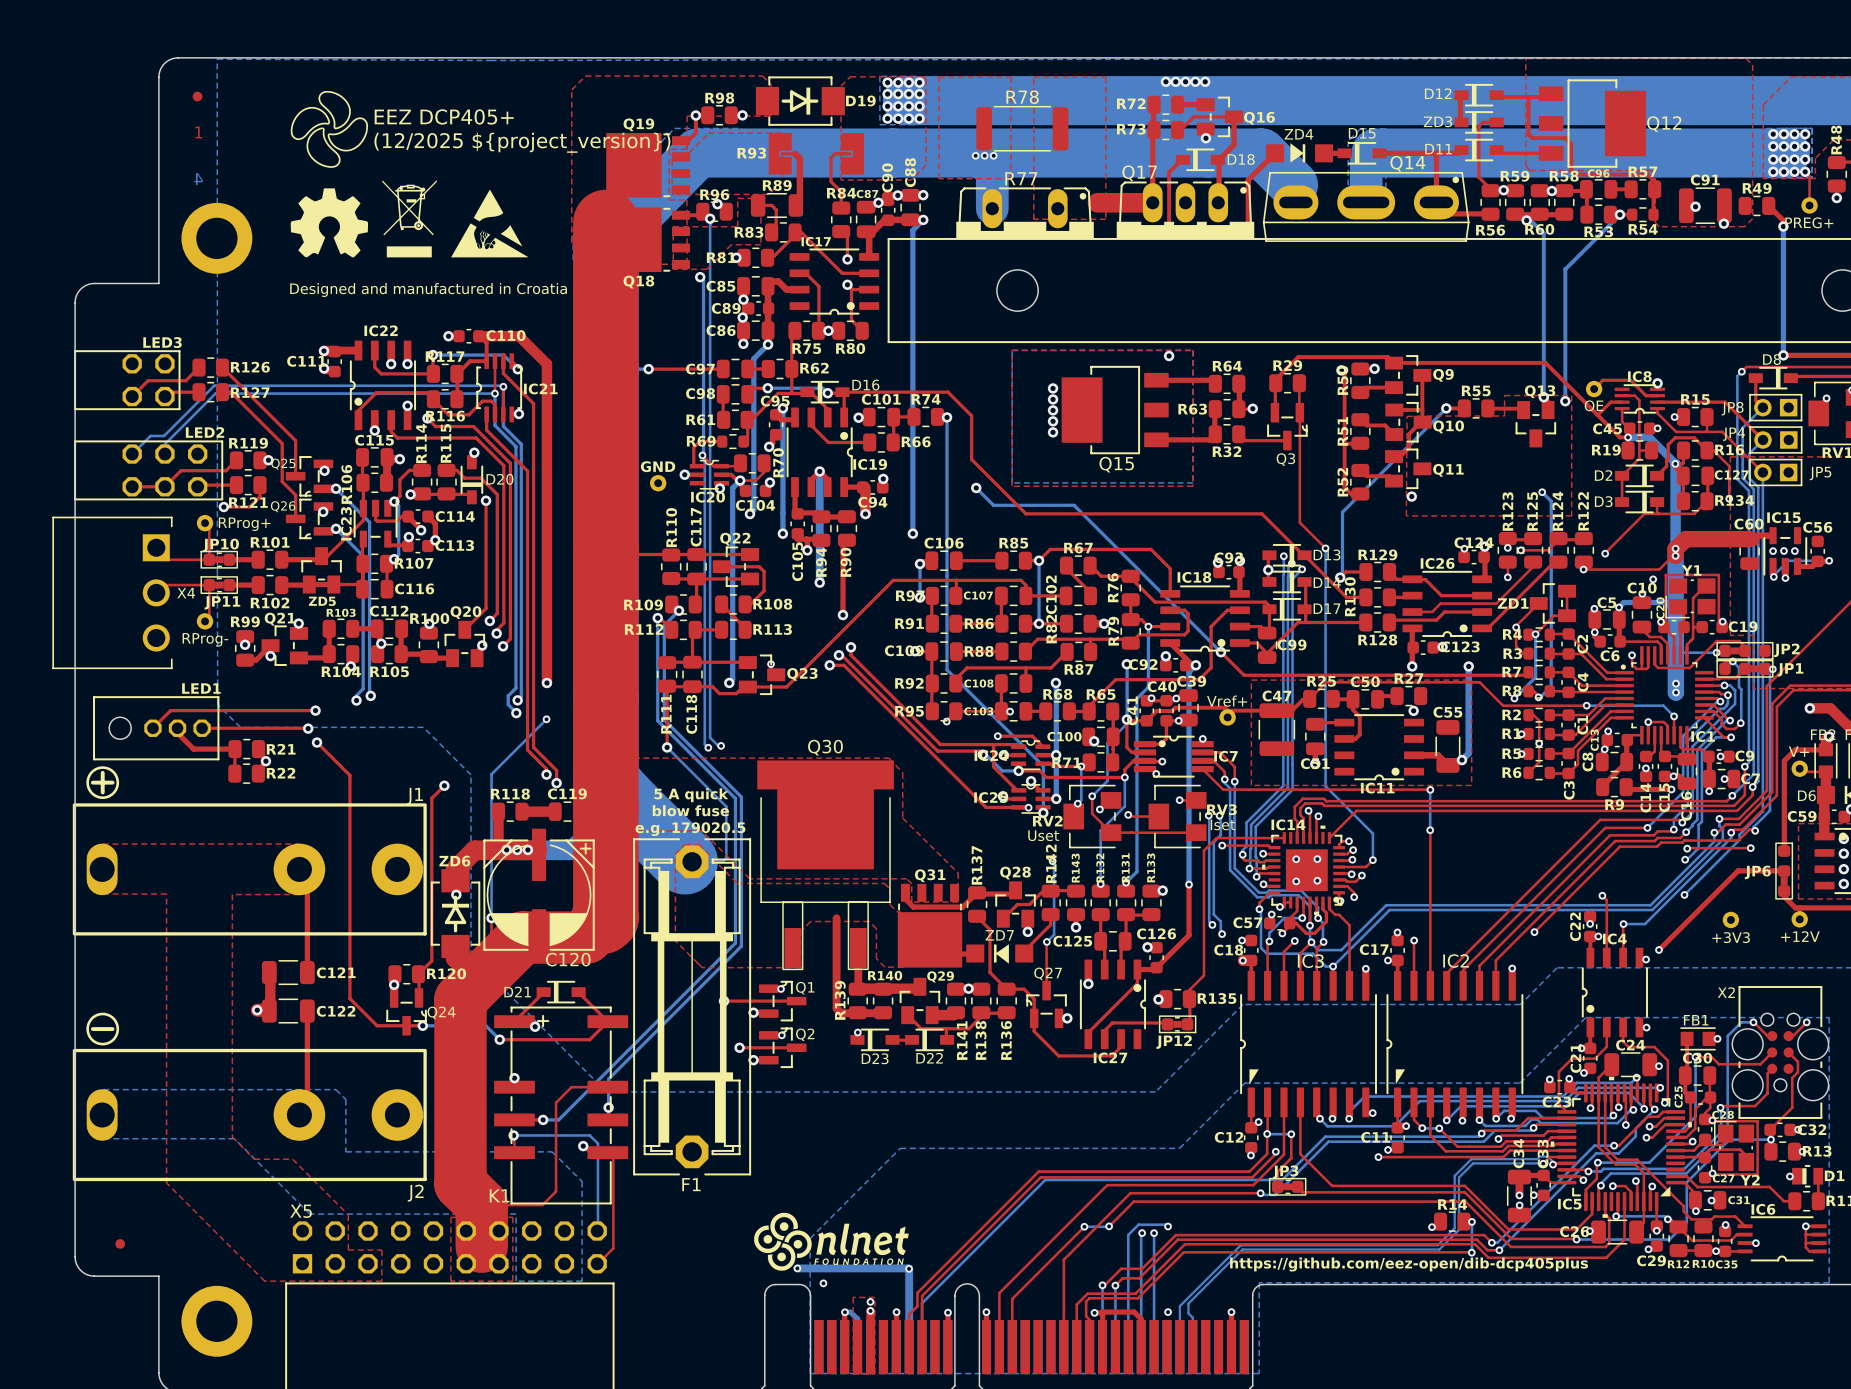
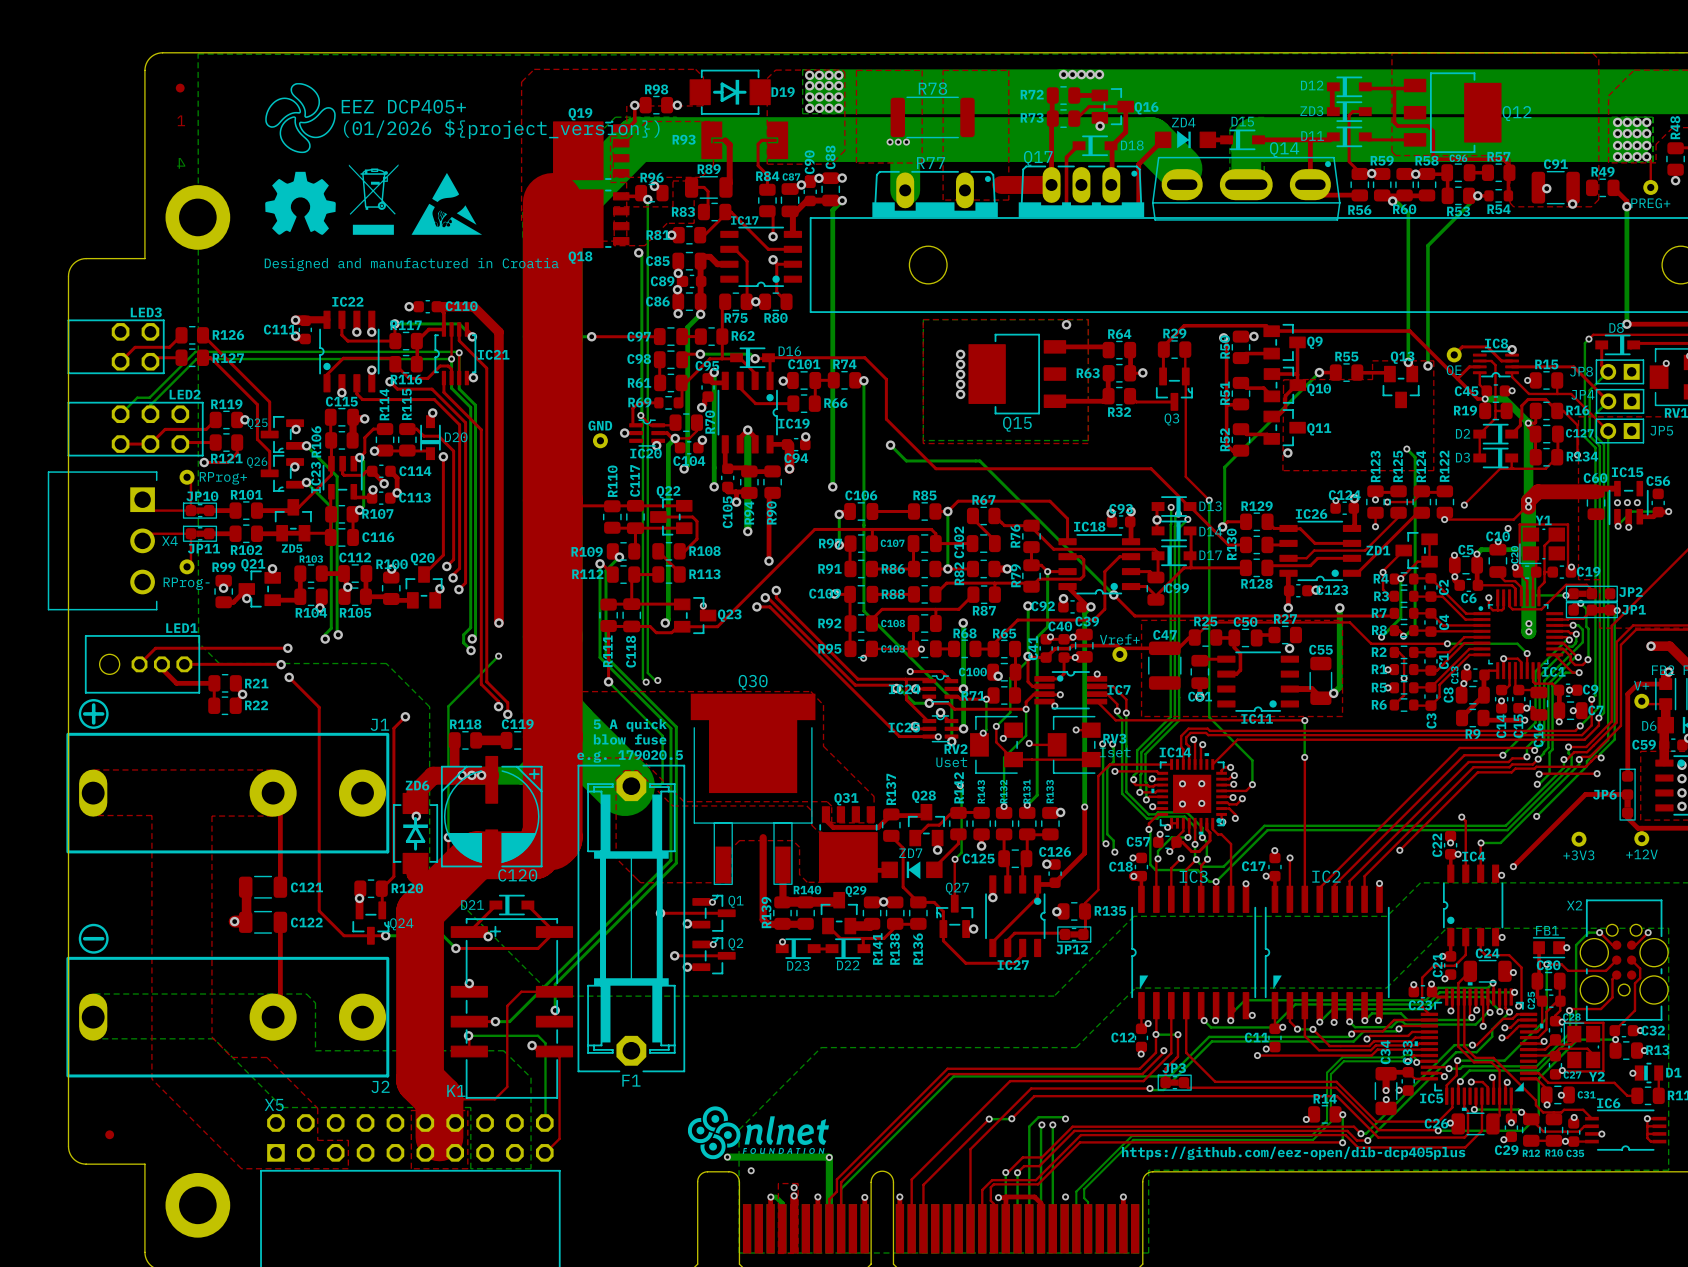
text: (12/2025 ${project_version}) (522, 142) -> (01/2026 ${project_version}) (501, 129)

